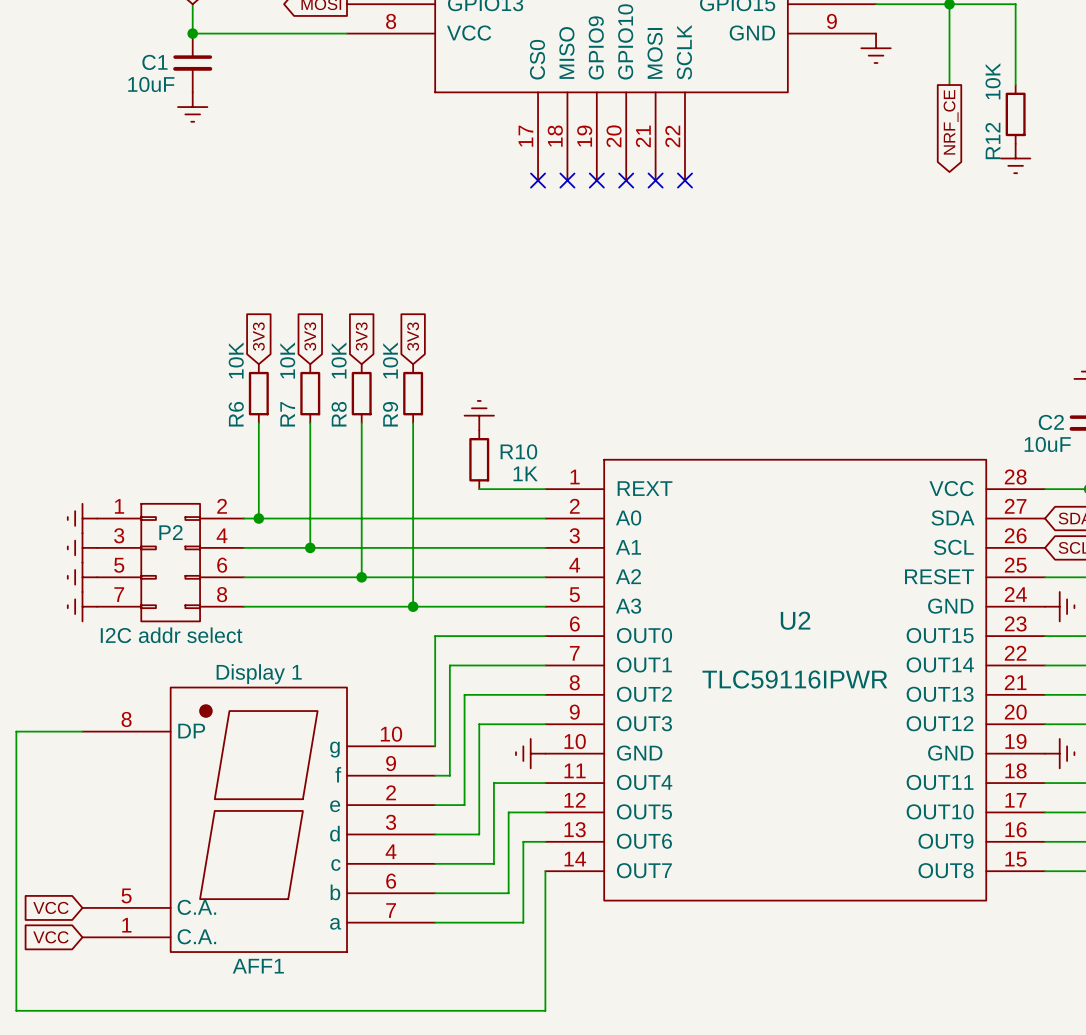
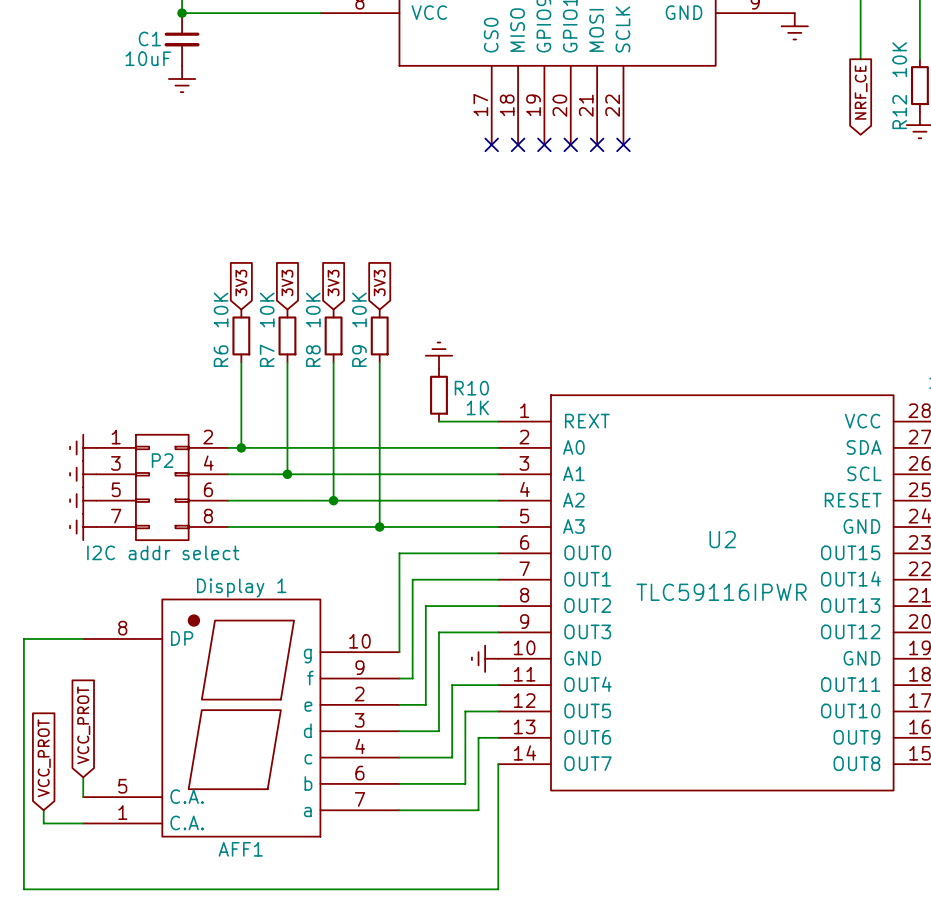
global label: none -> VCC_PROT (83, 725)
global label: none -> VCC_PROT (44, 758)
wire: none -> (83, 777) (83, 797)
global label: VCC (50, 907) -> none
wire: none -> (43, 810) (43, 823) (83, 823)
global label: VCC (50, 937) -> none

